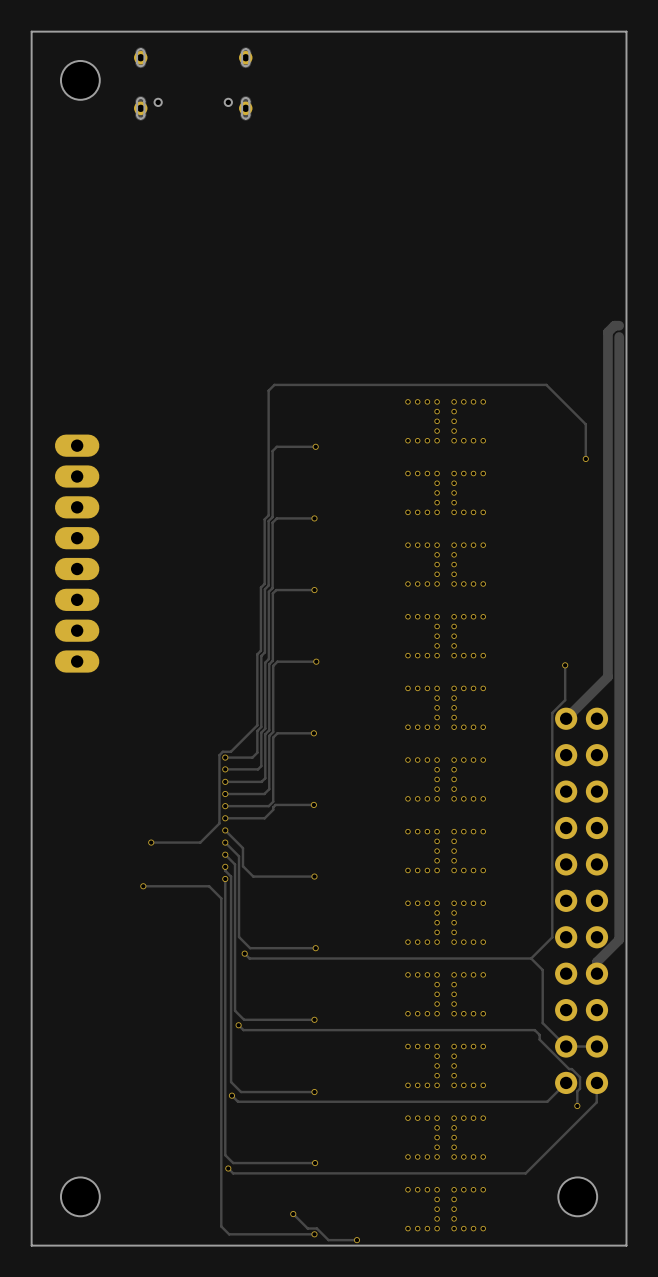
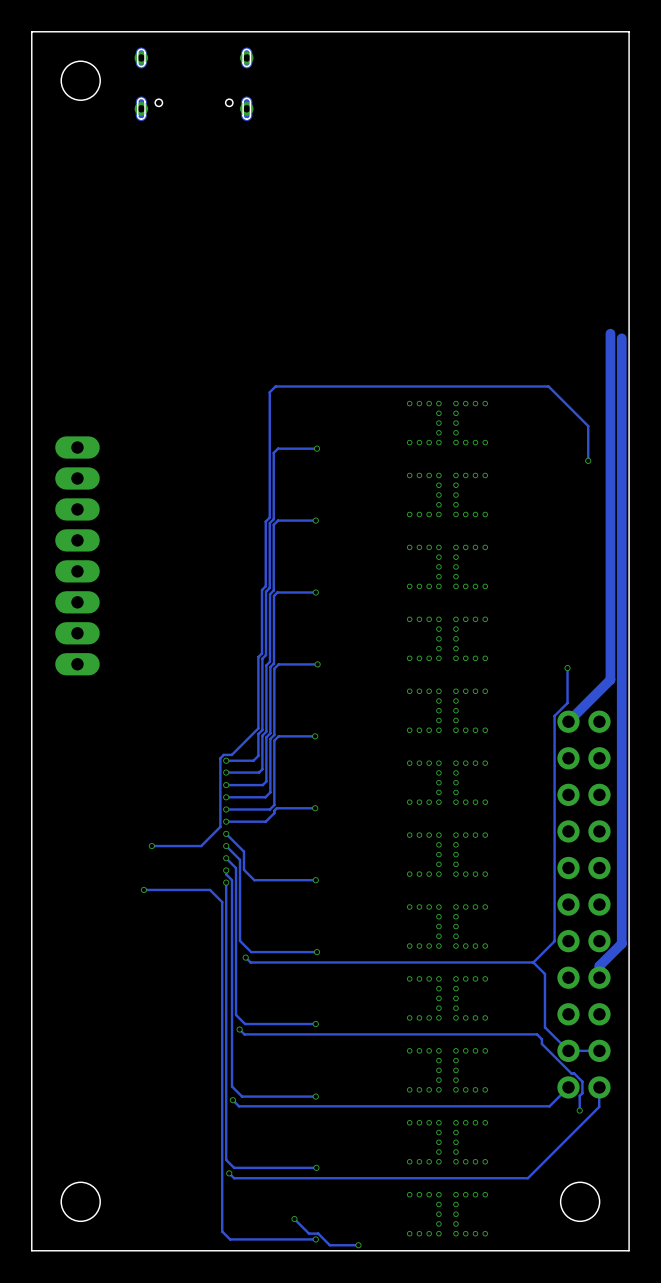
track: (619, 325) (614, 325) (607, 332) -> none

